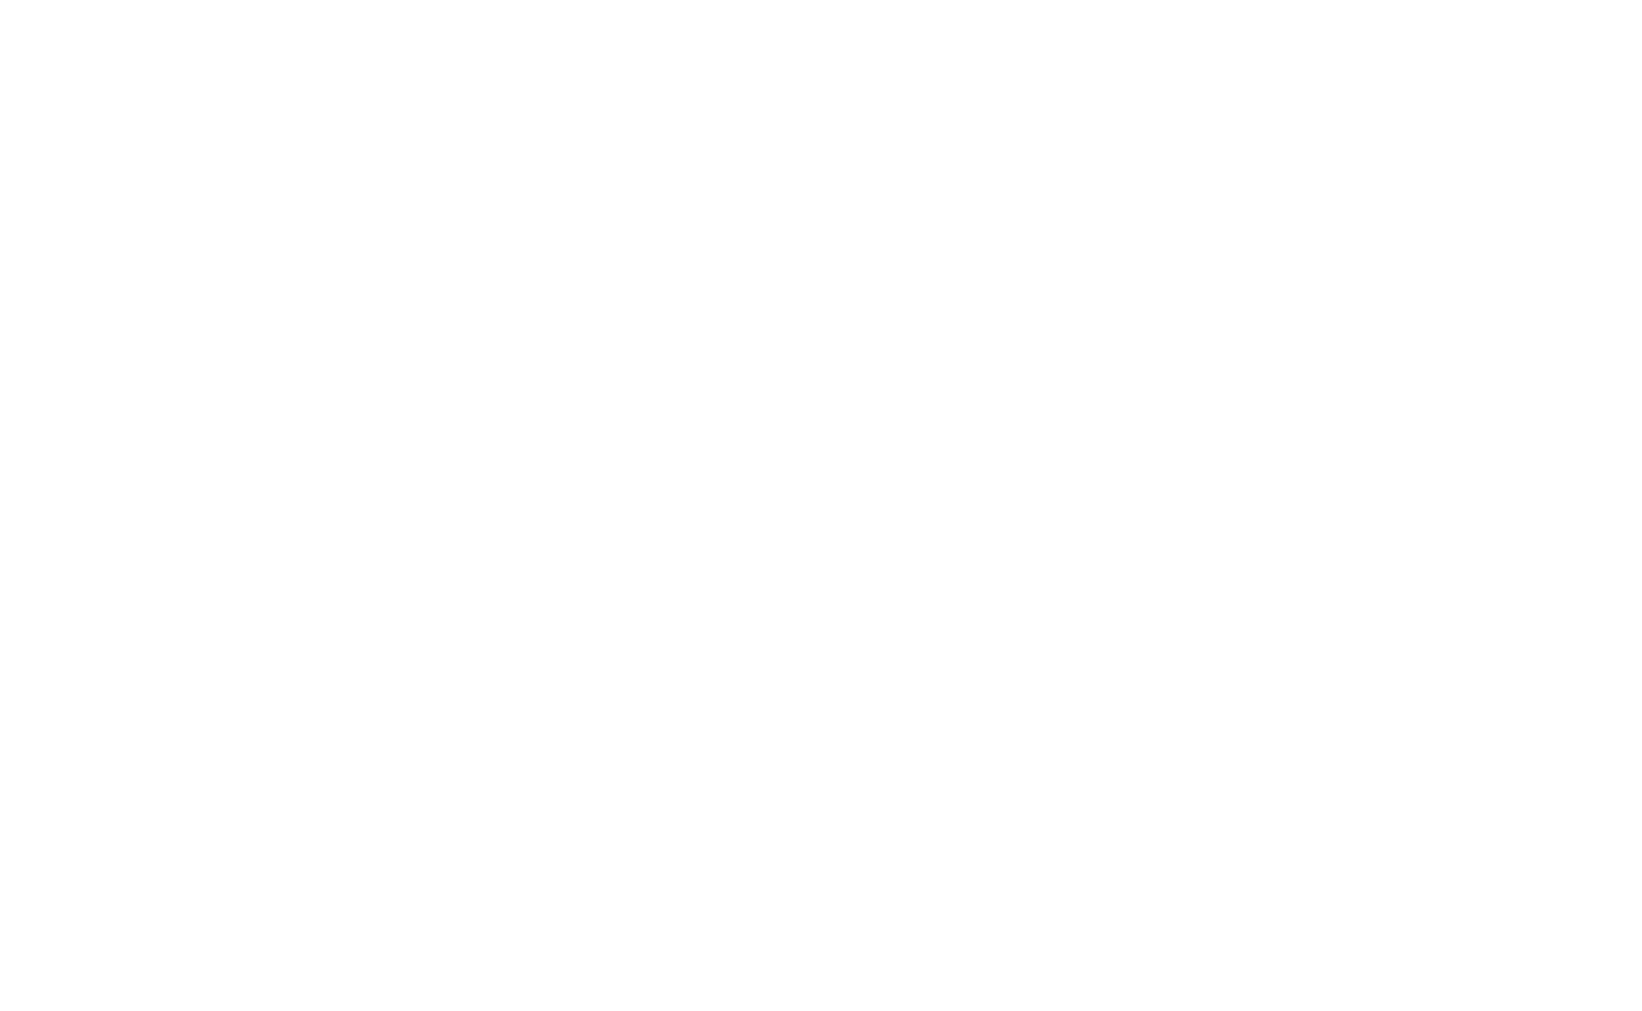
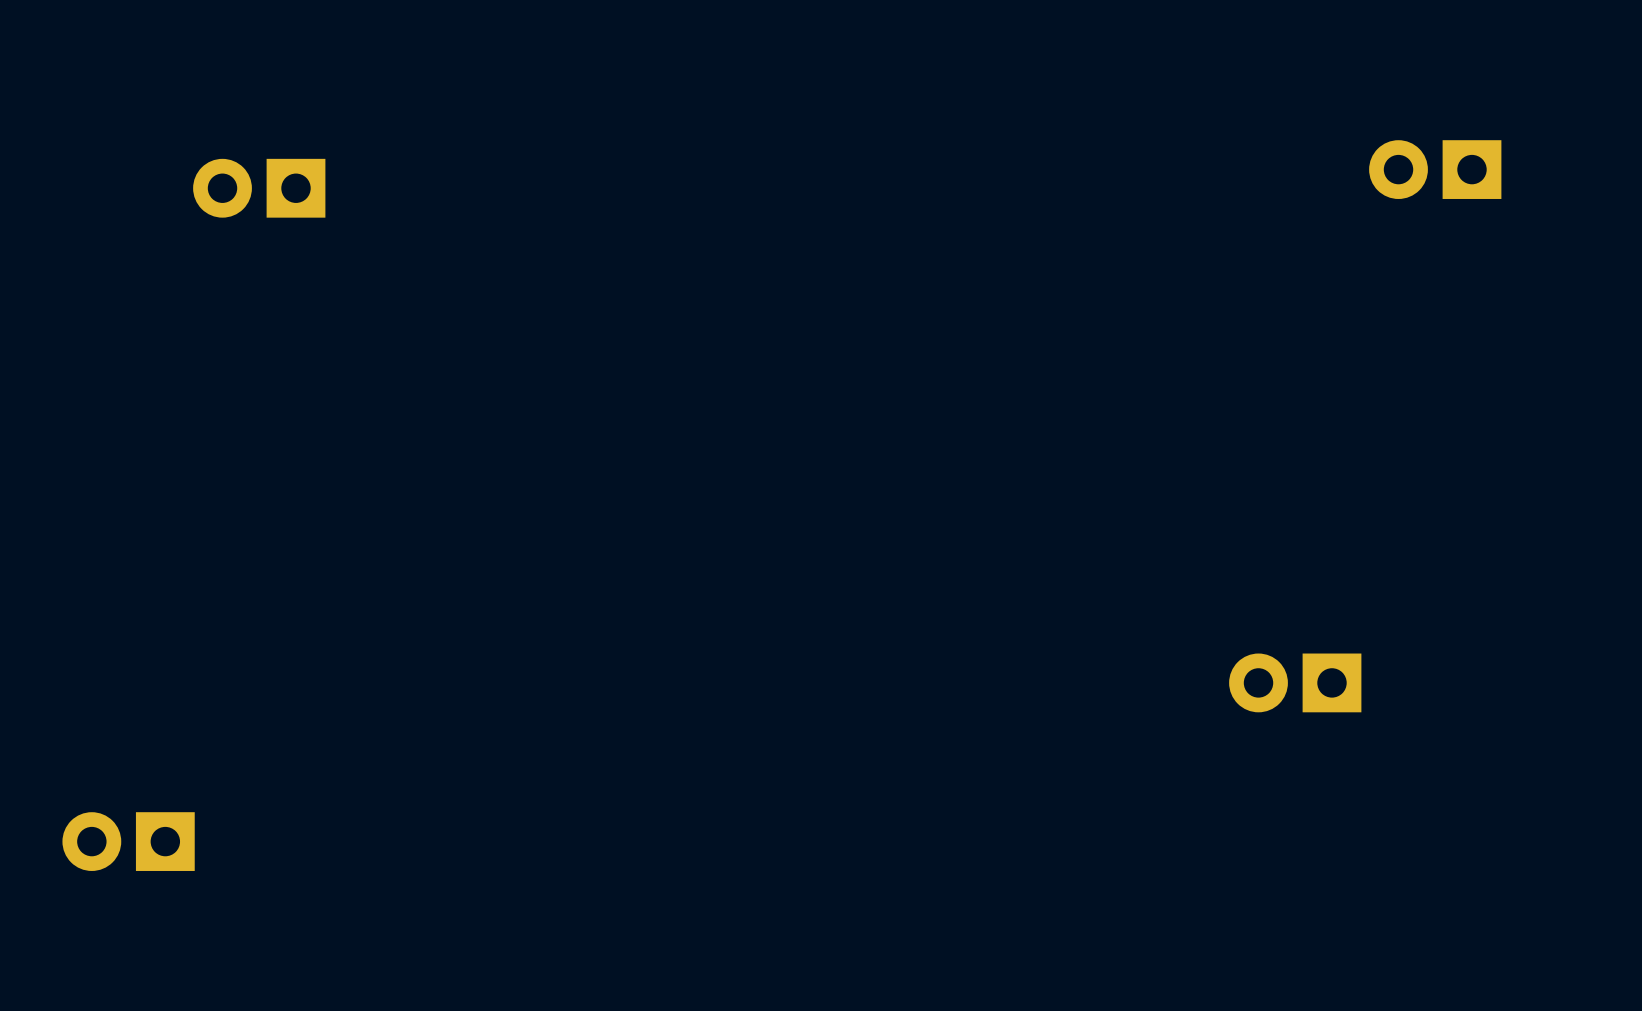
part: none -> (1435, 169)
part: none -> (259, 188)
part: none -> (1295, 682)
part: none -> (128, 841)

